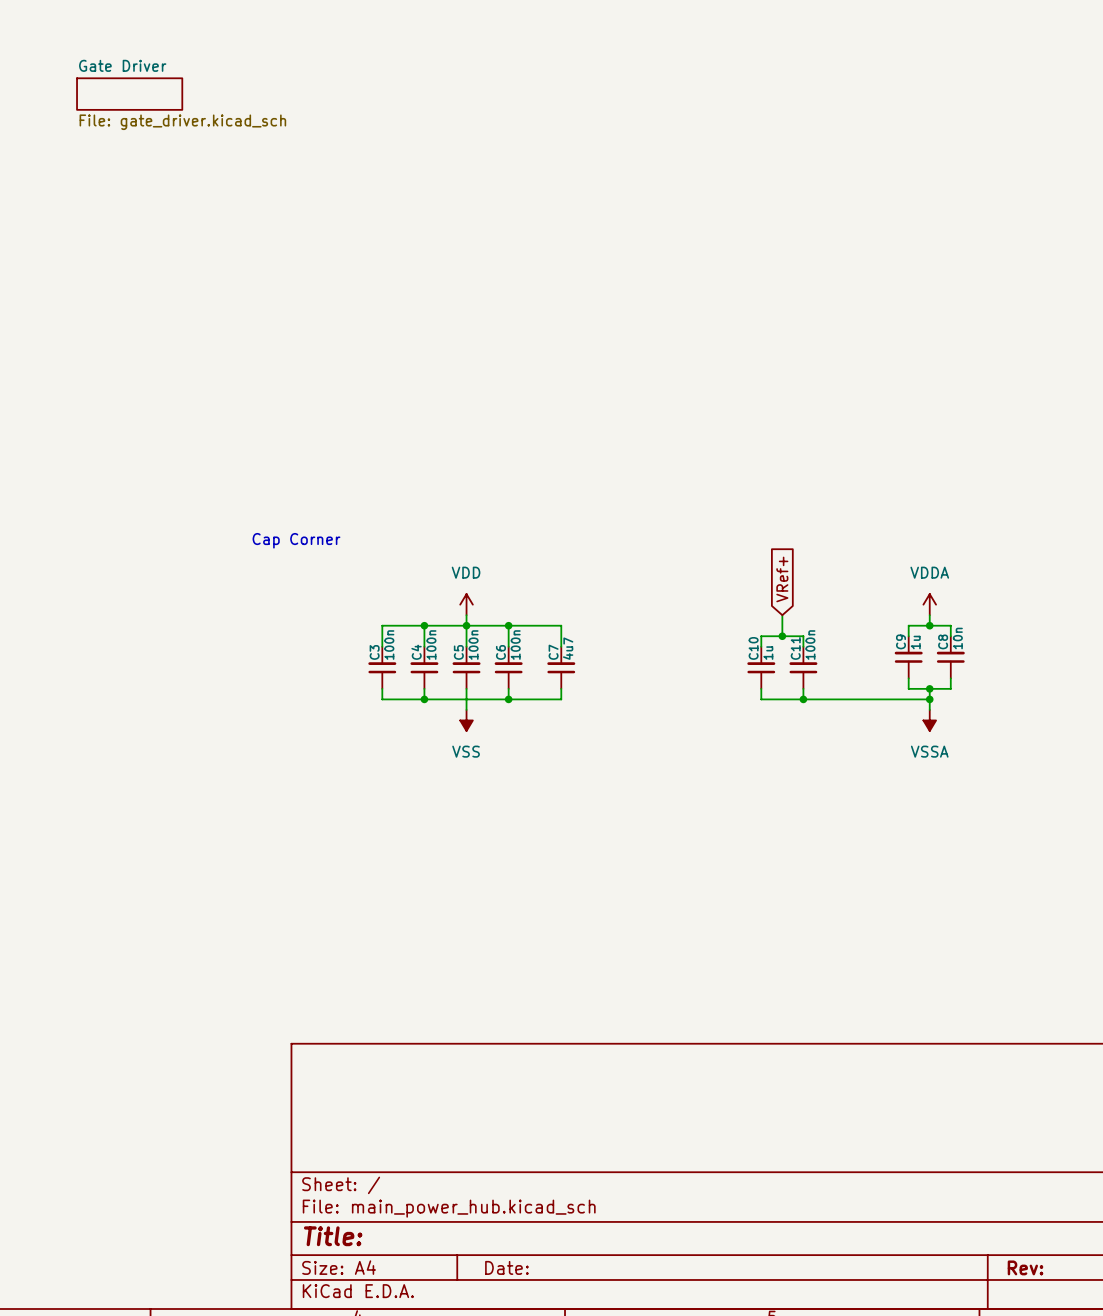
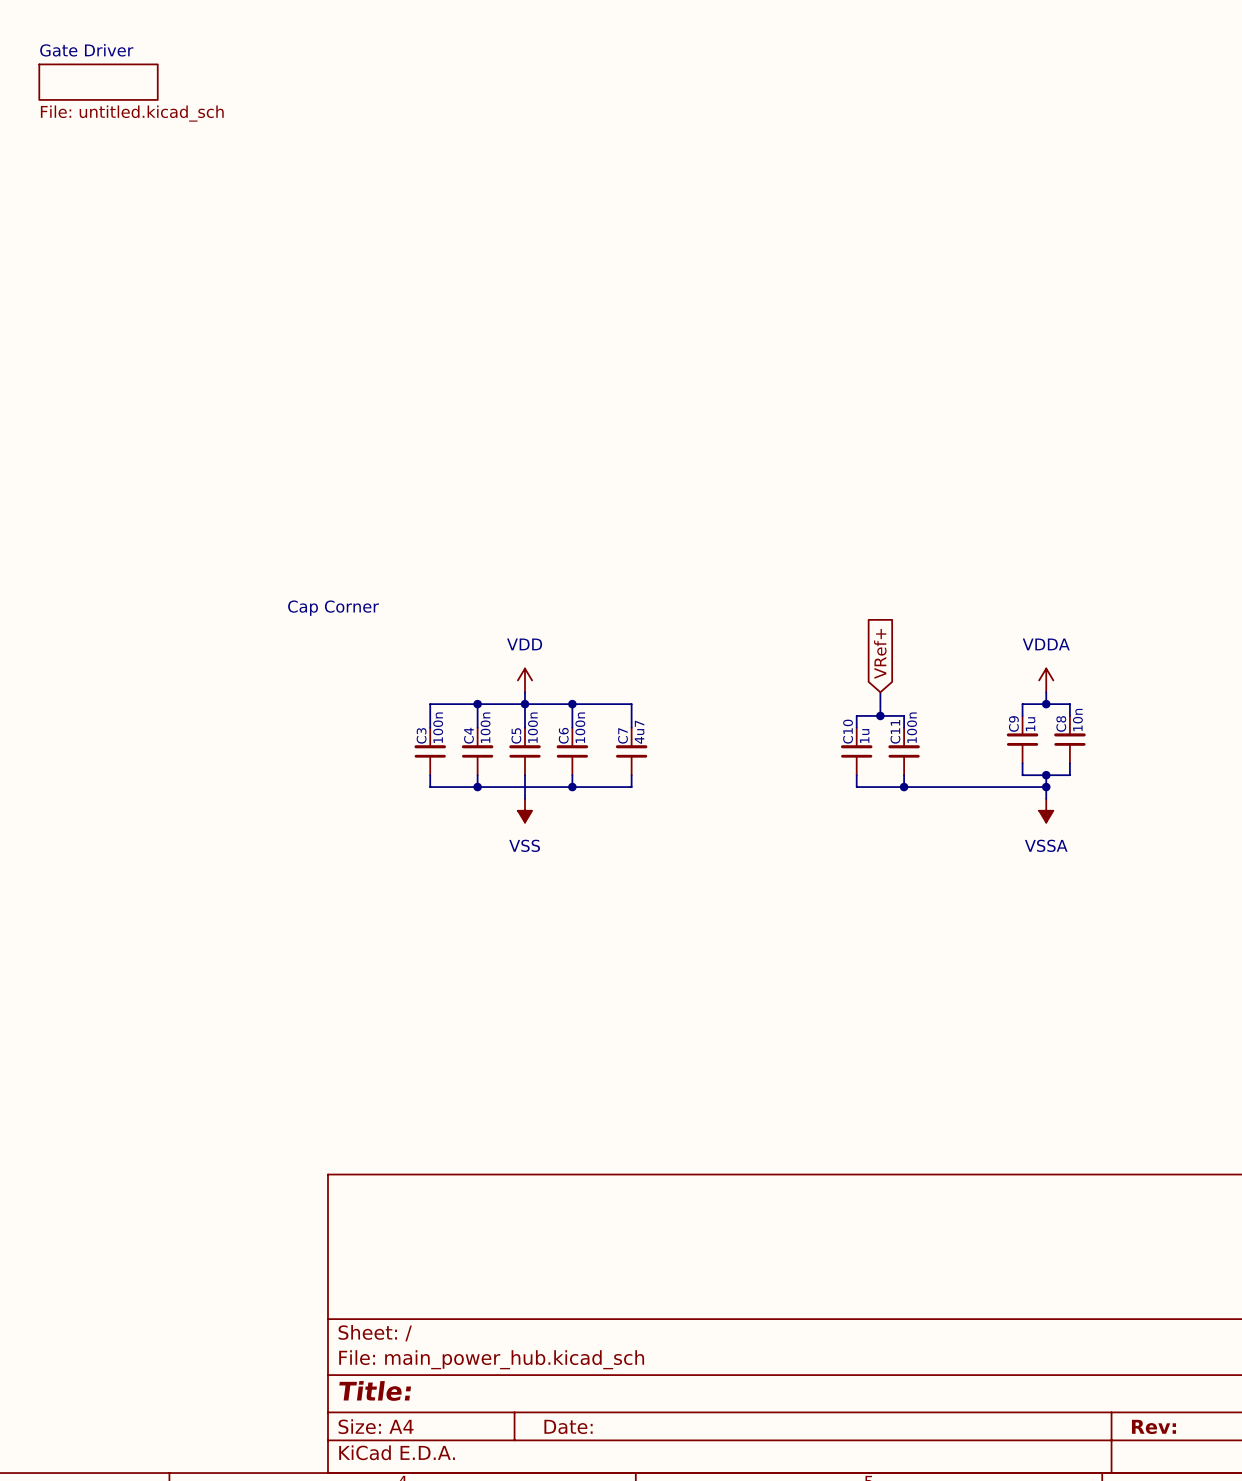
sheet Gate Driver: none -> File: untitled.kicad_sch (98, 82)
sheet Gate Driver: File: gate_driver.kicad_sch (129, 94) -> none

